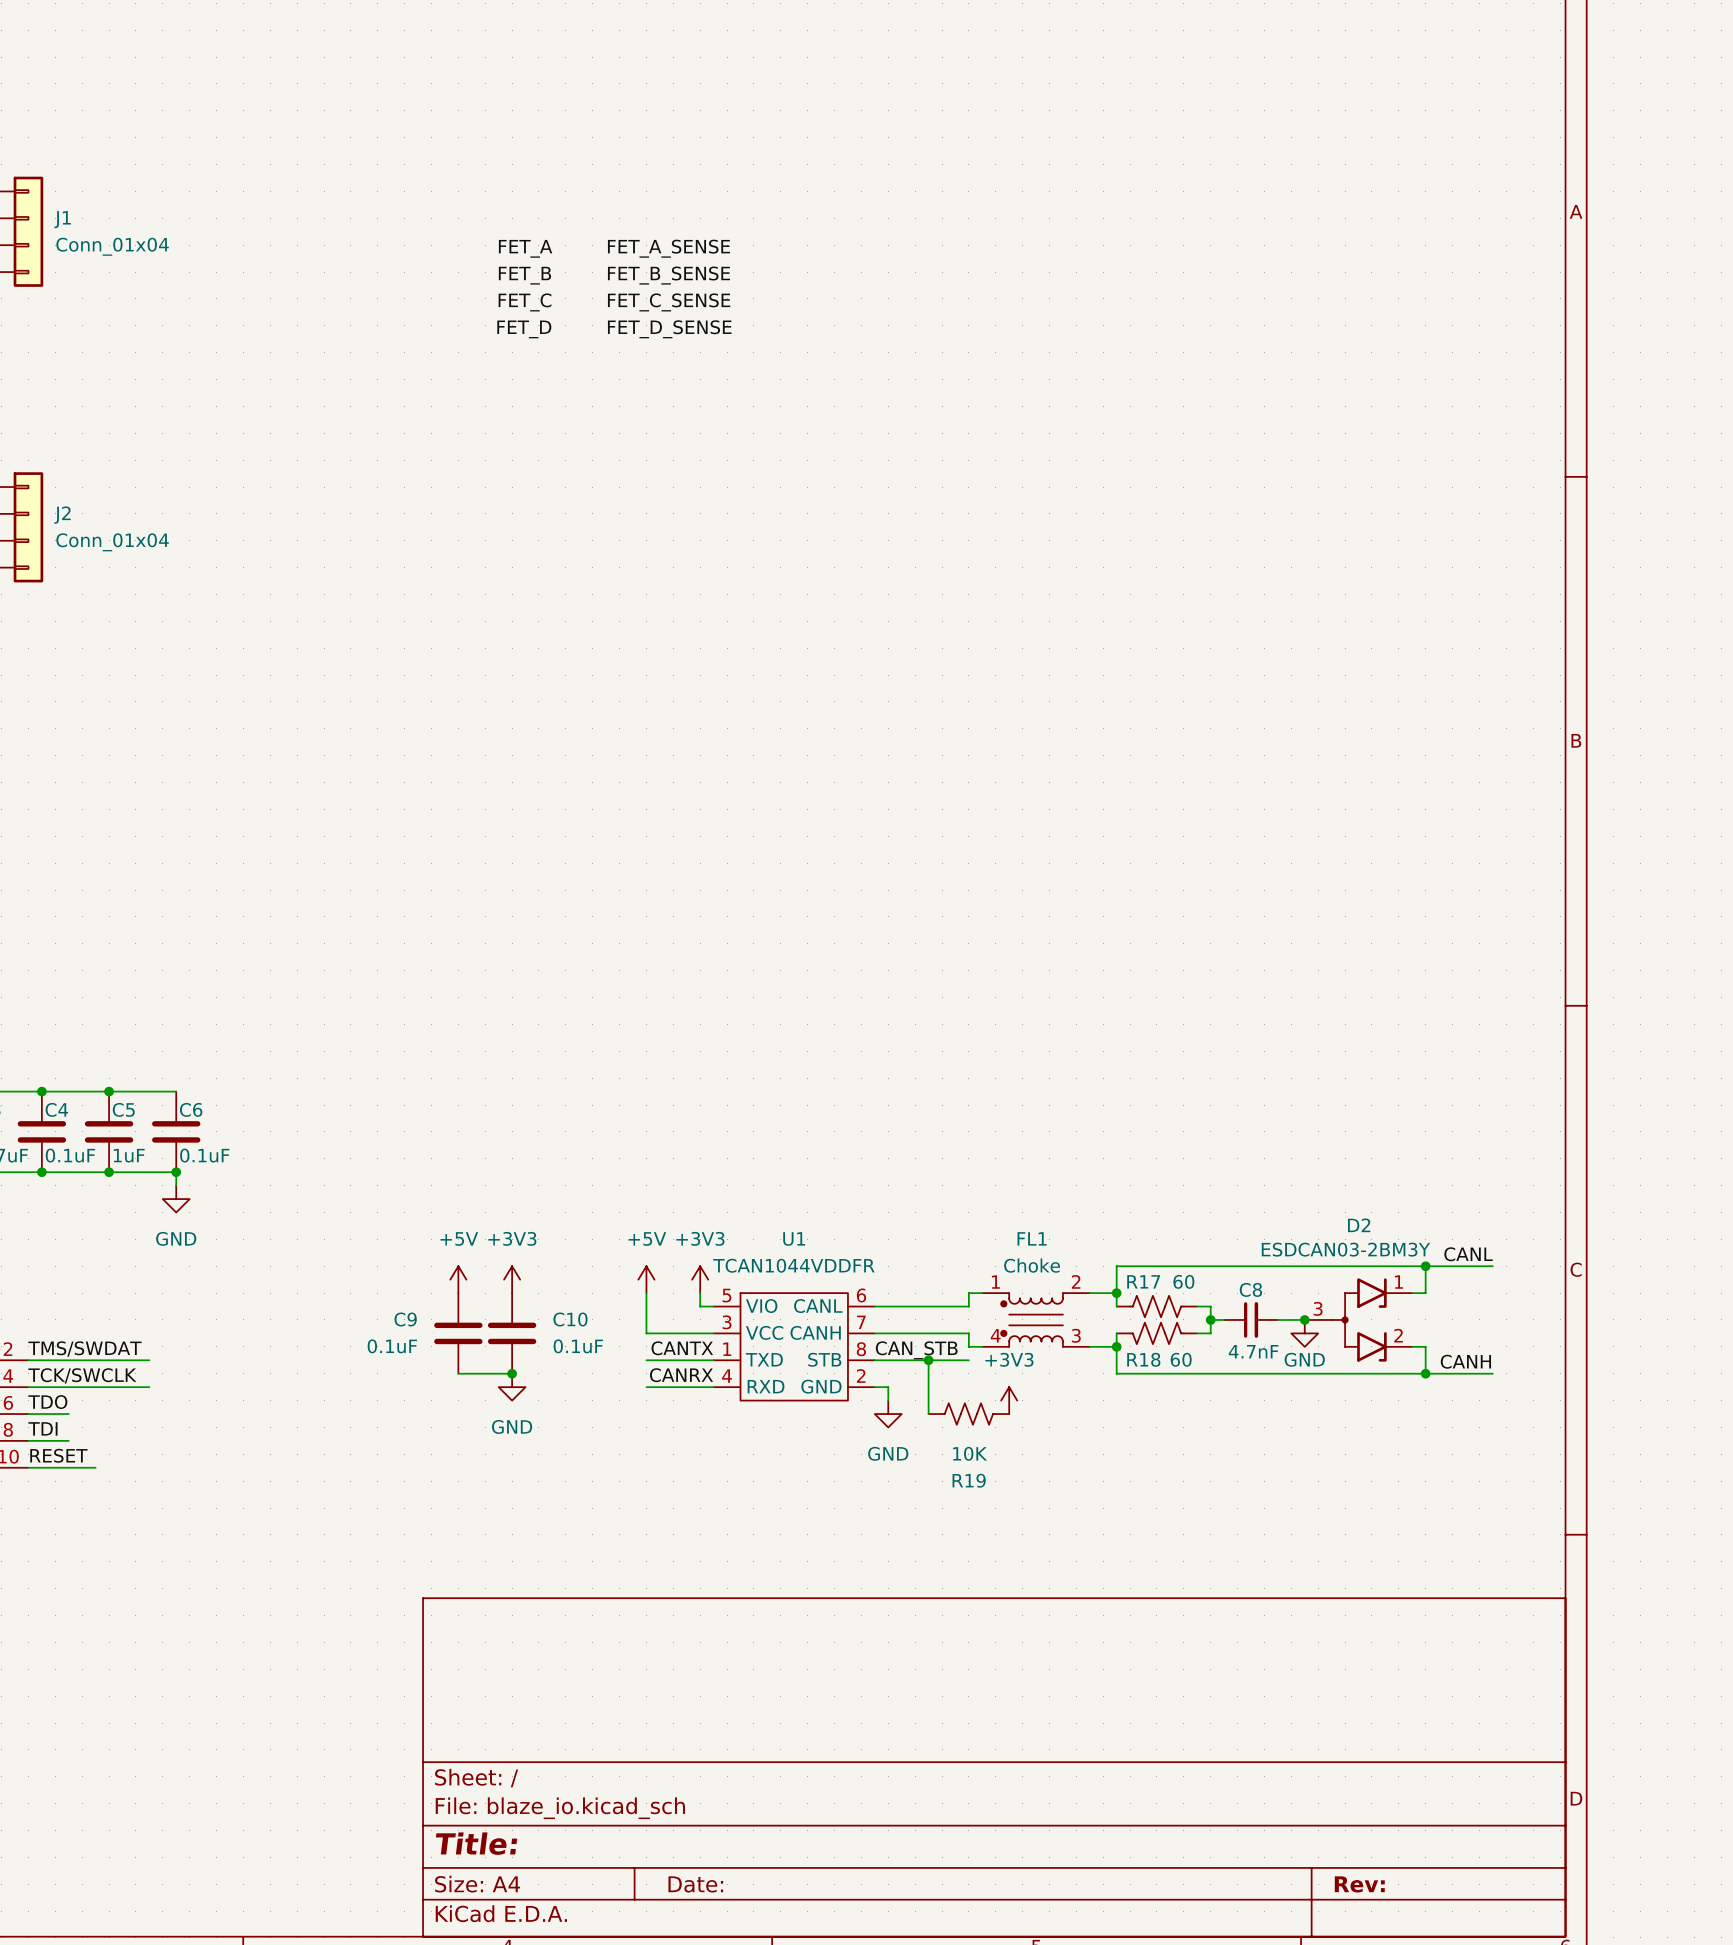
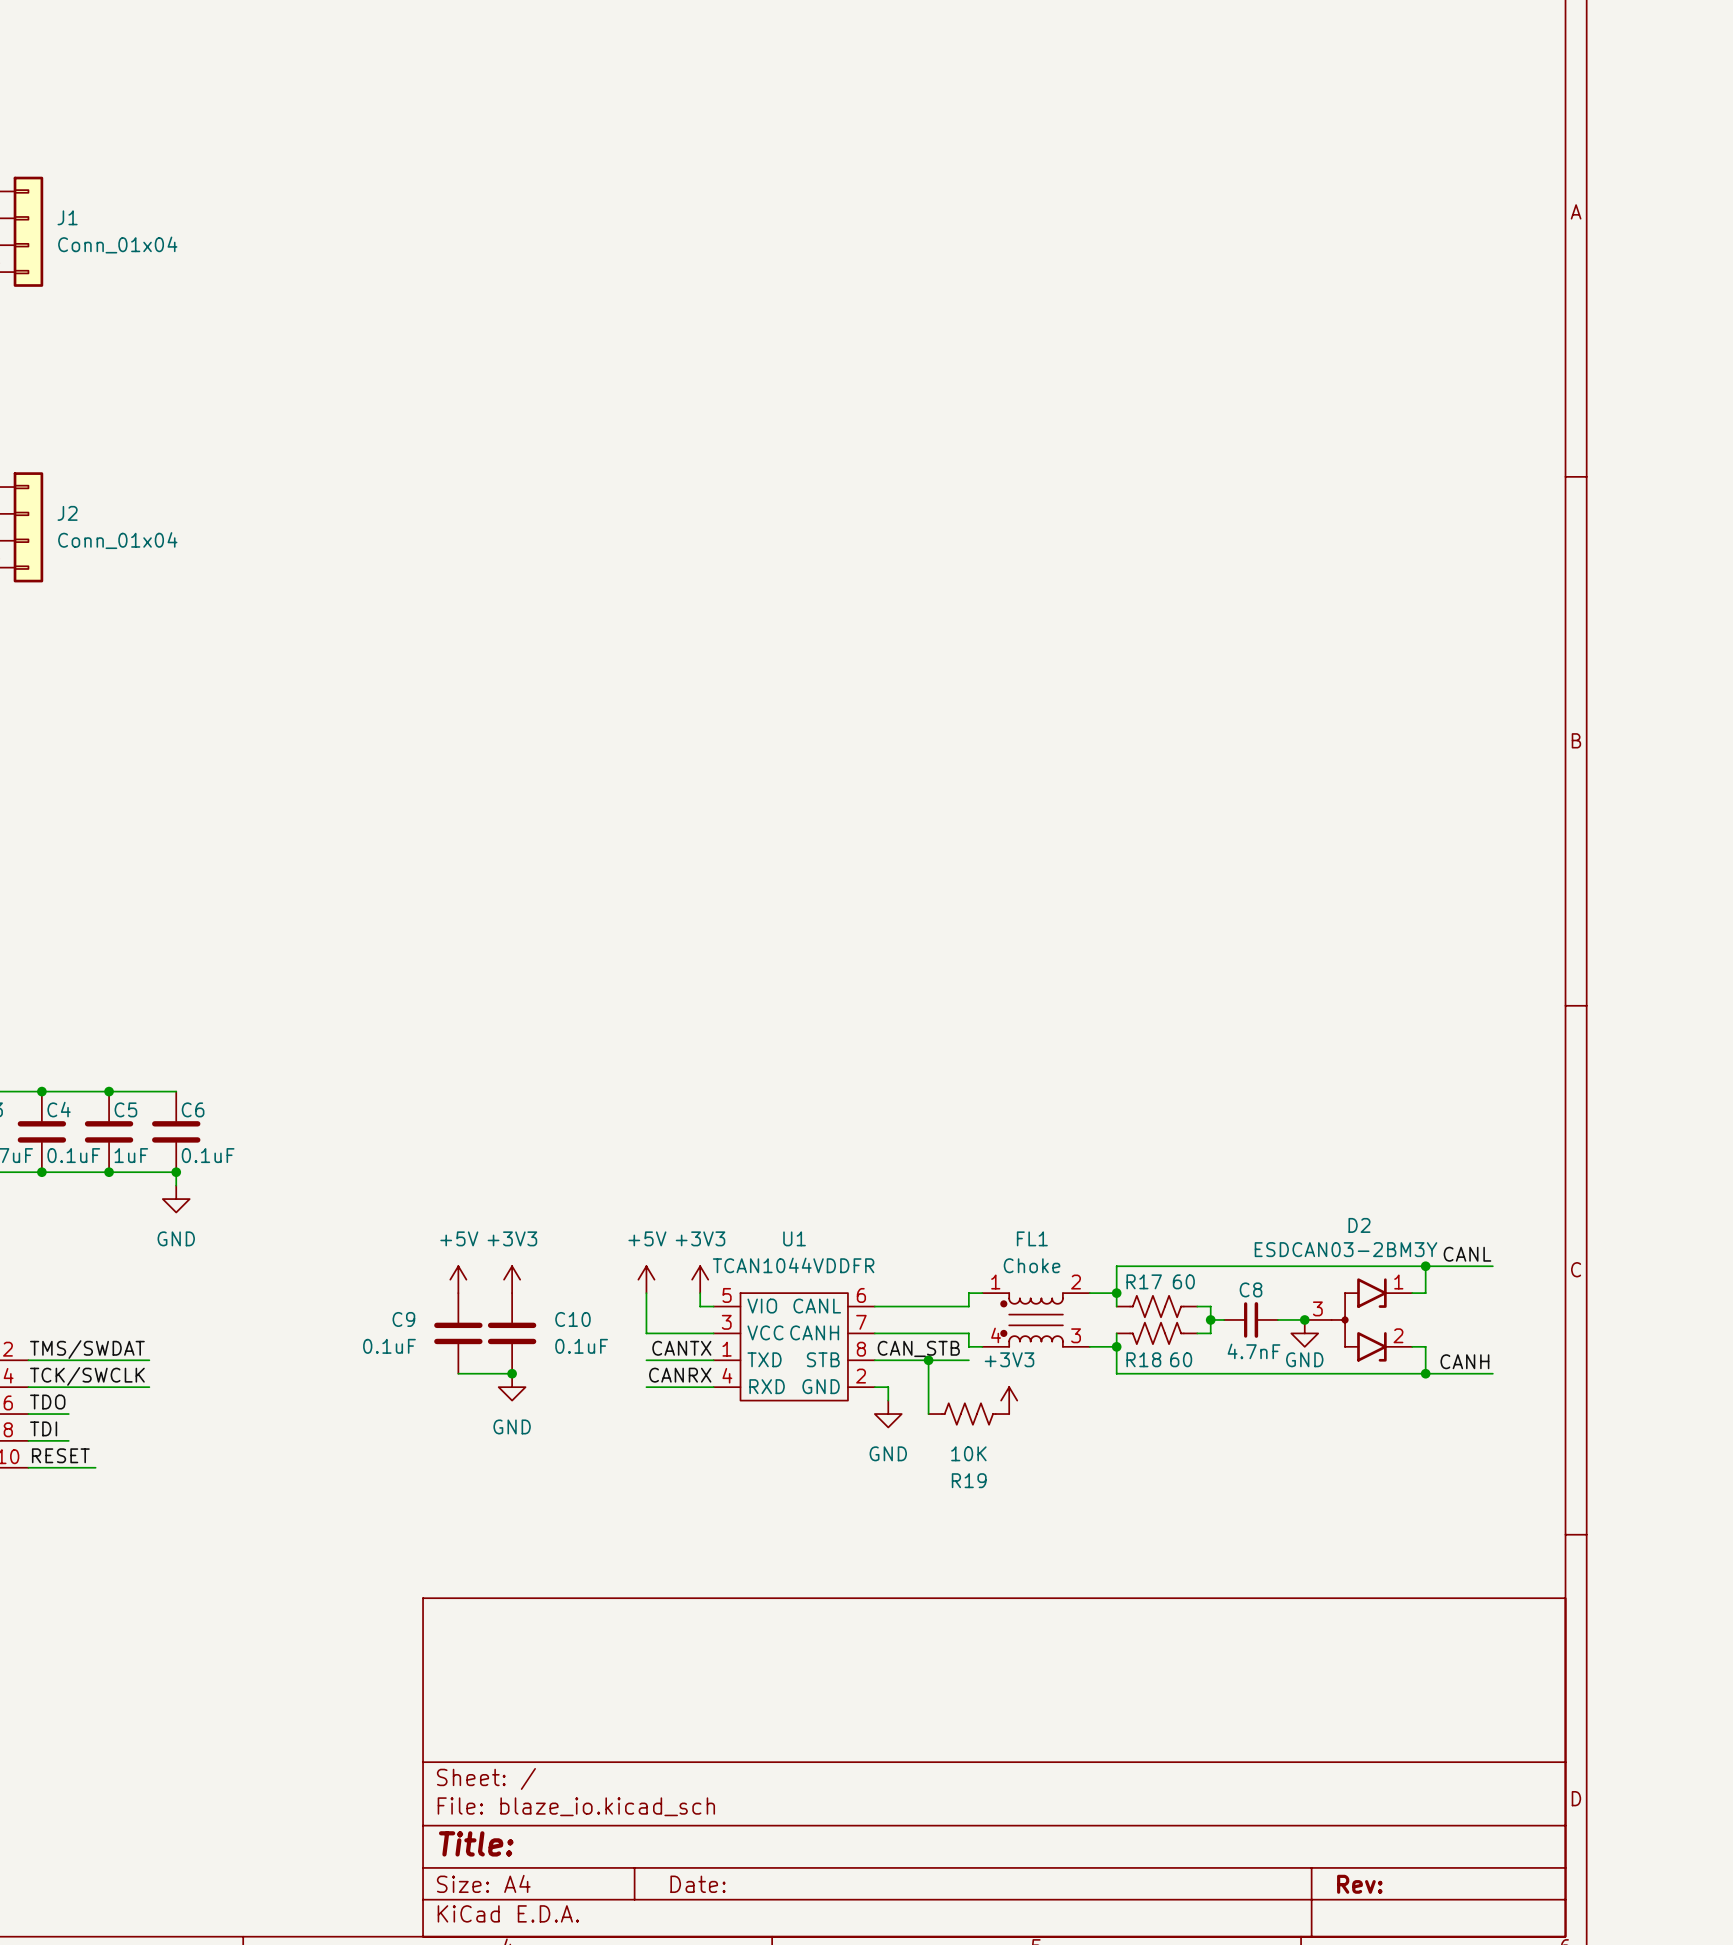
label: FET_A (525, 248) -> none
label: FET_A_SENSE (668, 248) -> none
label: FET_B (524, 275) -> none
label: FET_B_SENSE (668, 275) -> none
label: FET_C (525, 302) -> none
label: FET_C_SENSE (669, 302) -> none
label: FET_D (524, 329) -> none
label: FET_D_SENSE (669, 329) -> none

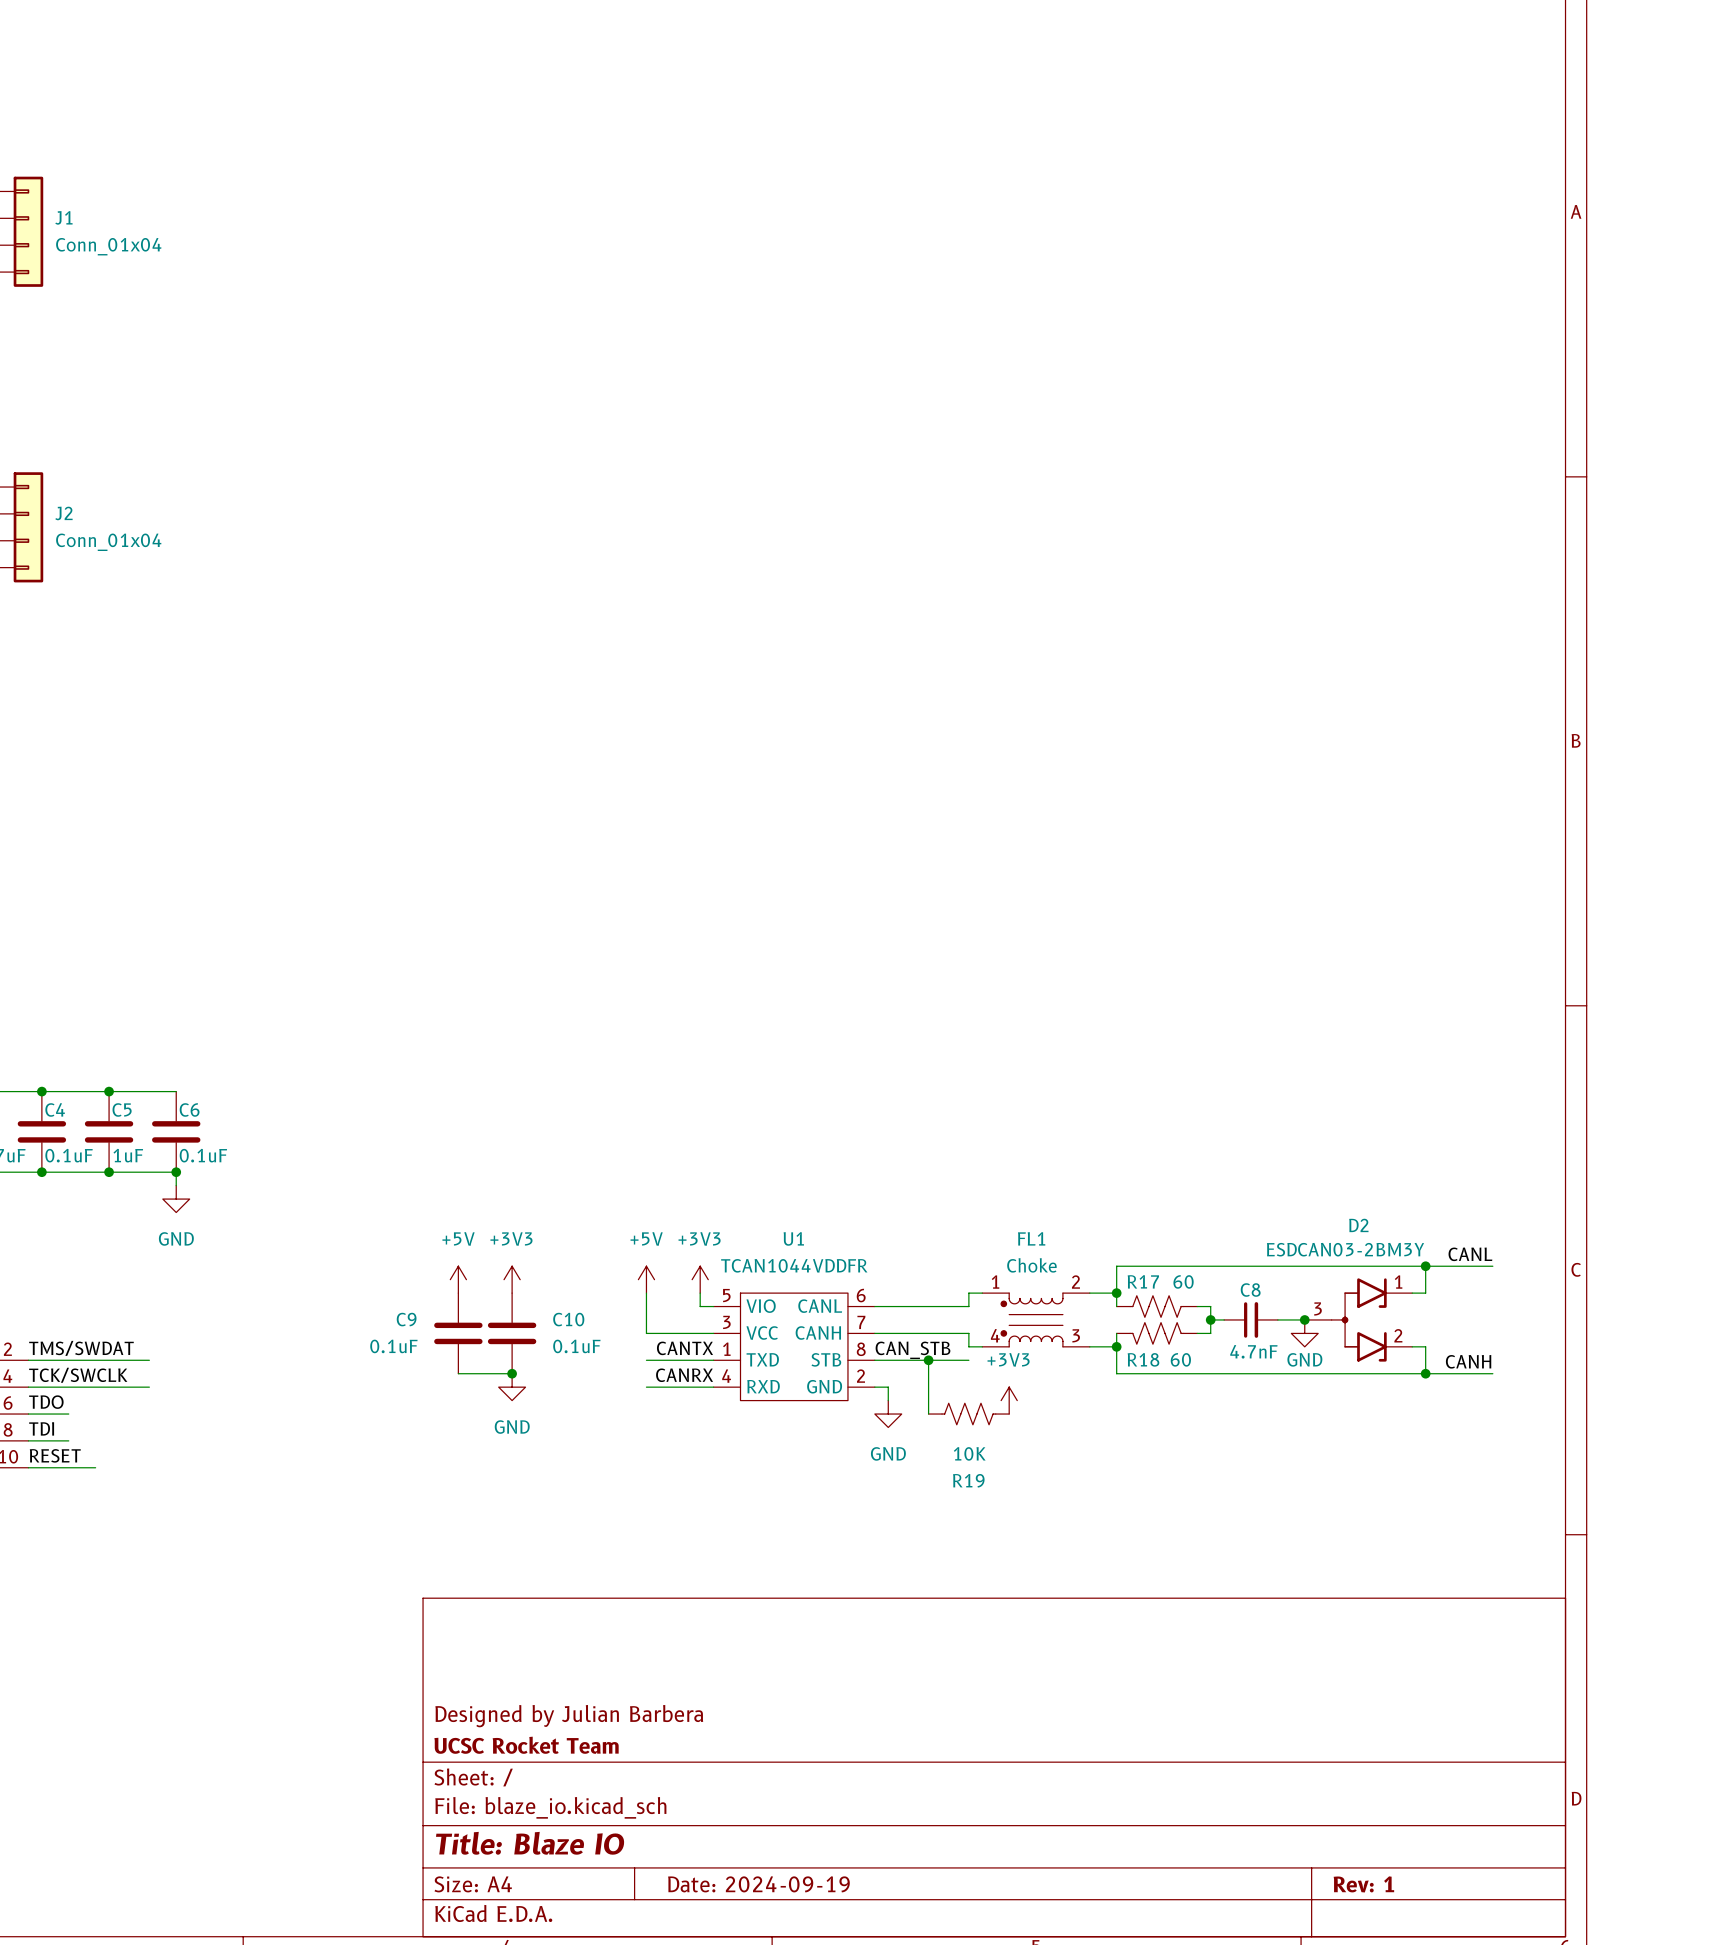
title block: none -> Designed by Julian Barbera (569, 1716)
title block: none -> UCSC Rocket Team (526, 1745)
title block: Title: (476, 1843) -> Title: Blaze IO (530, 1843)
title block: Date: (698, 1884) -> Date: 2024-09-19 (758, 1884)
title block: Rev: (1359, 1884) -> Rev: 1 (1363, 1884)

